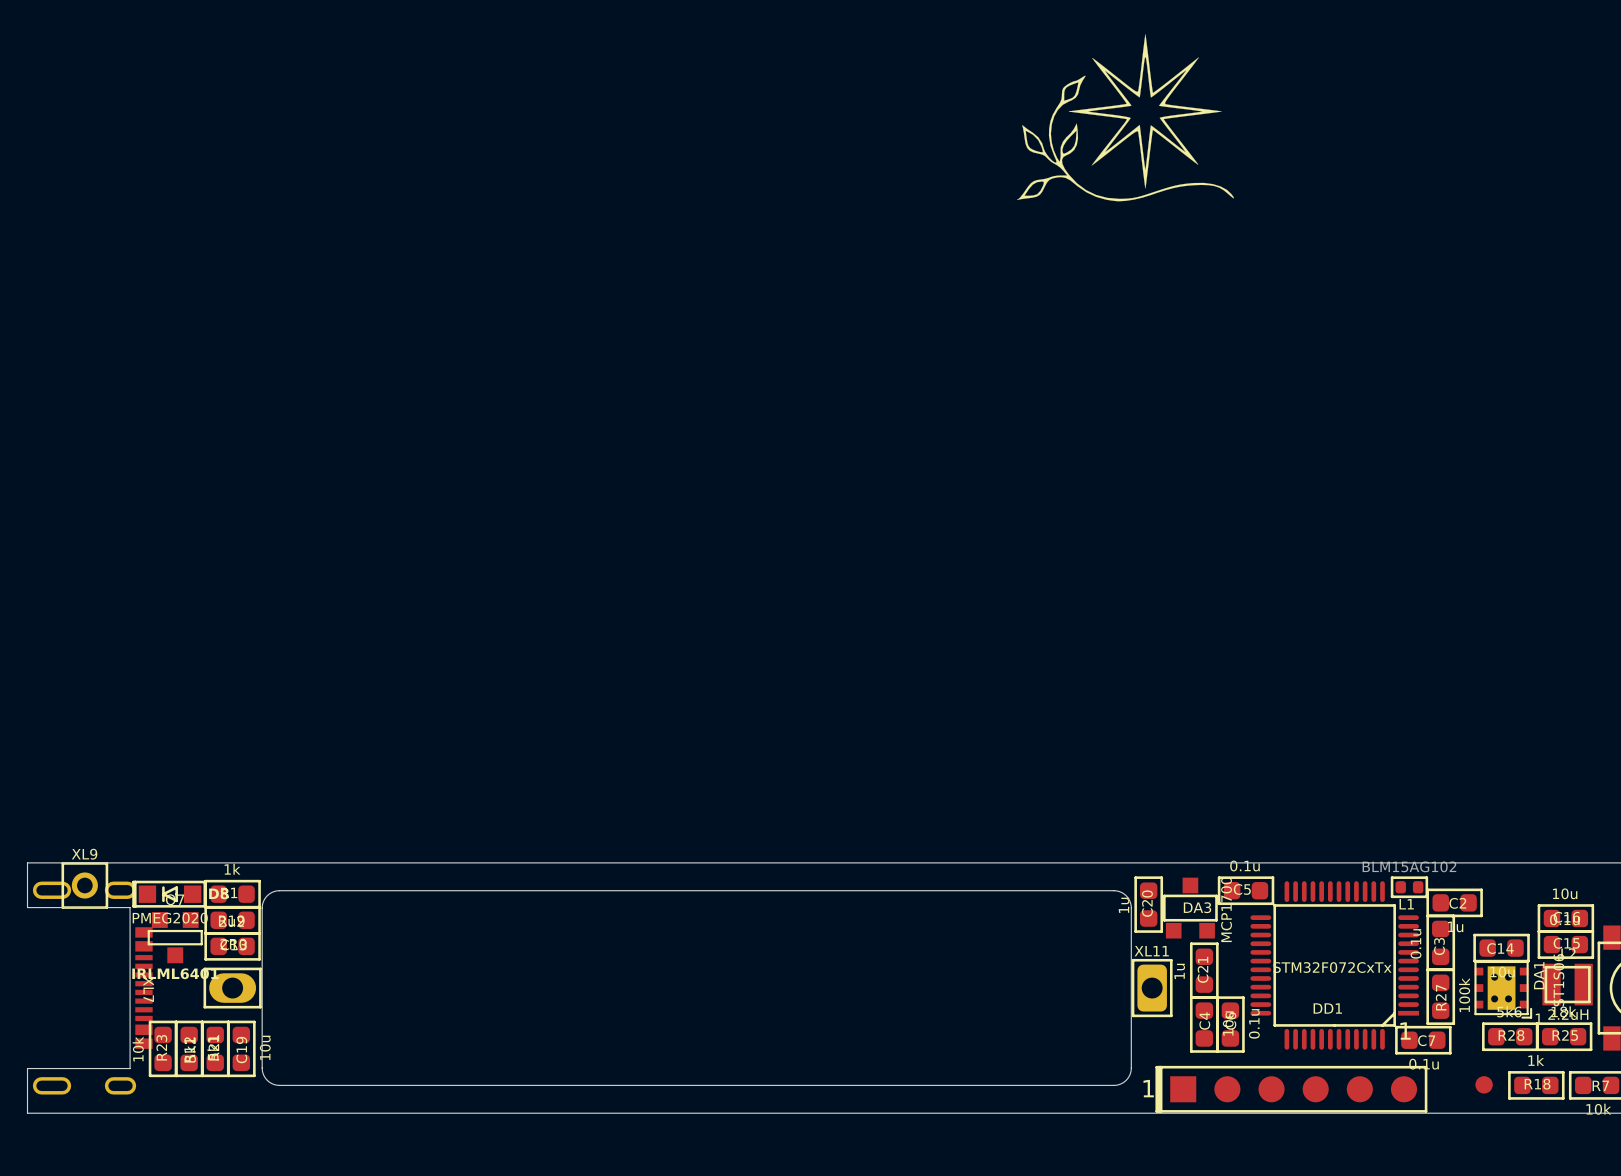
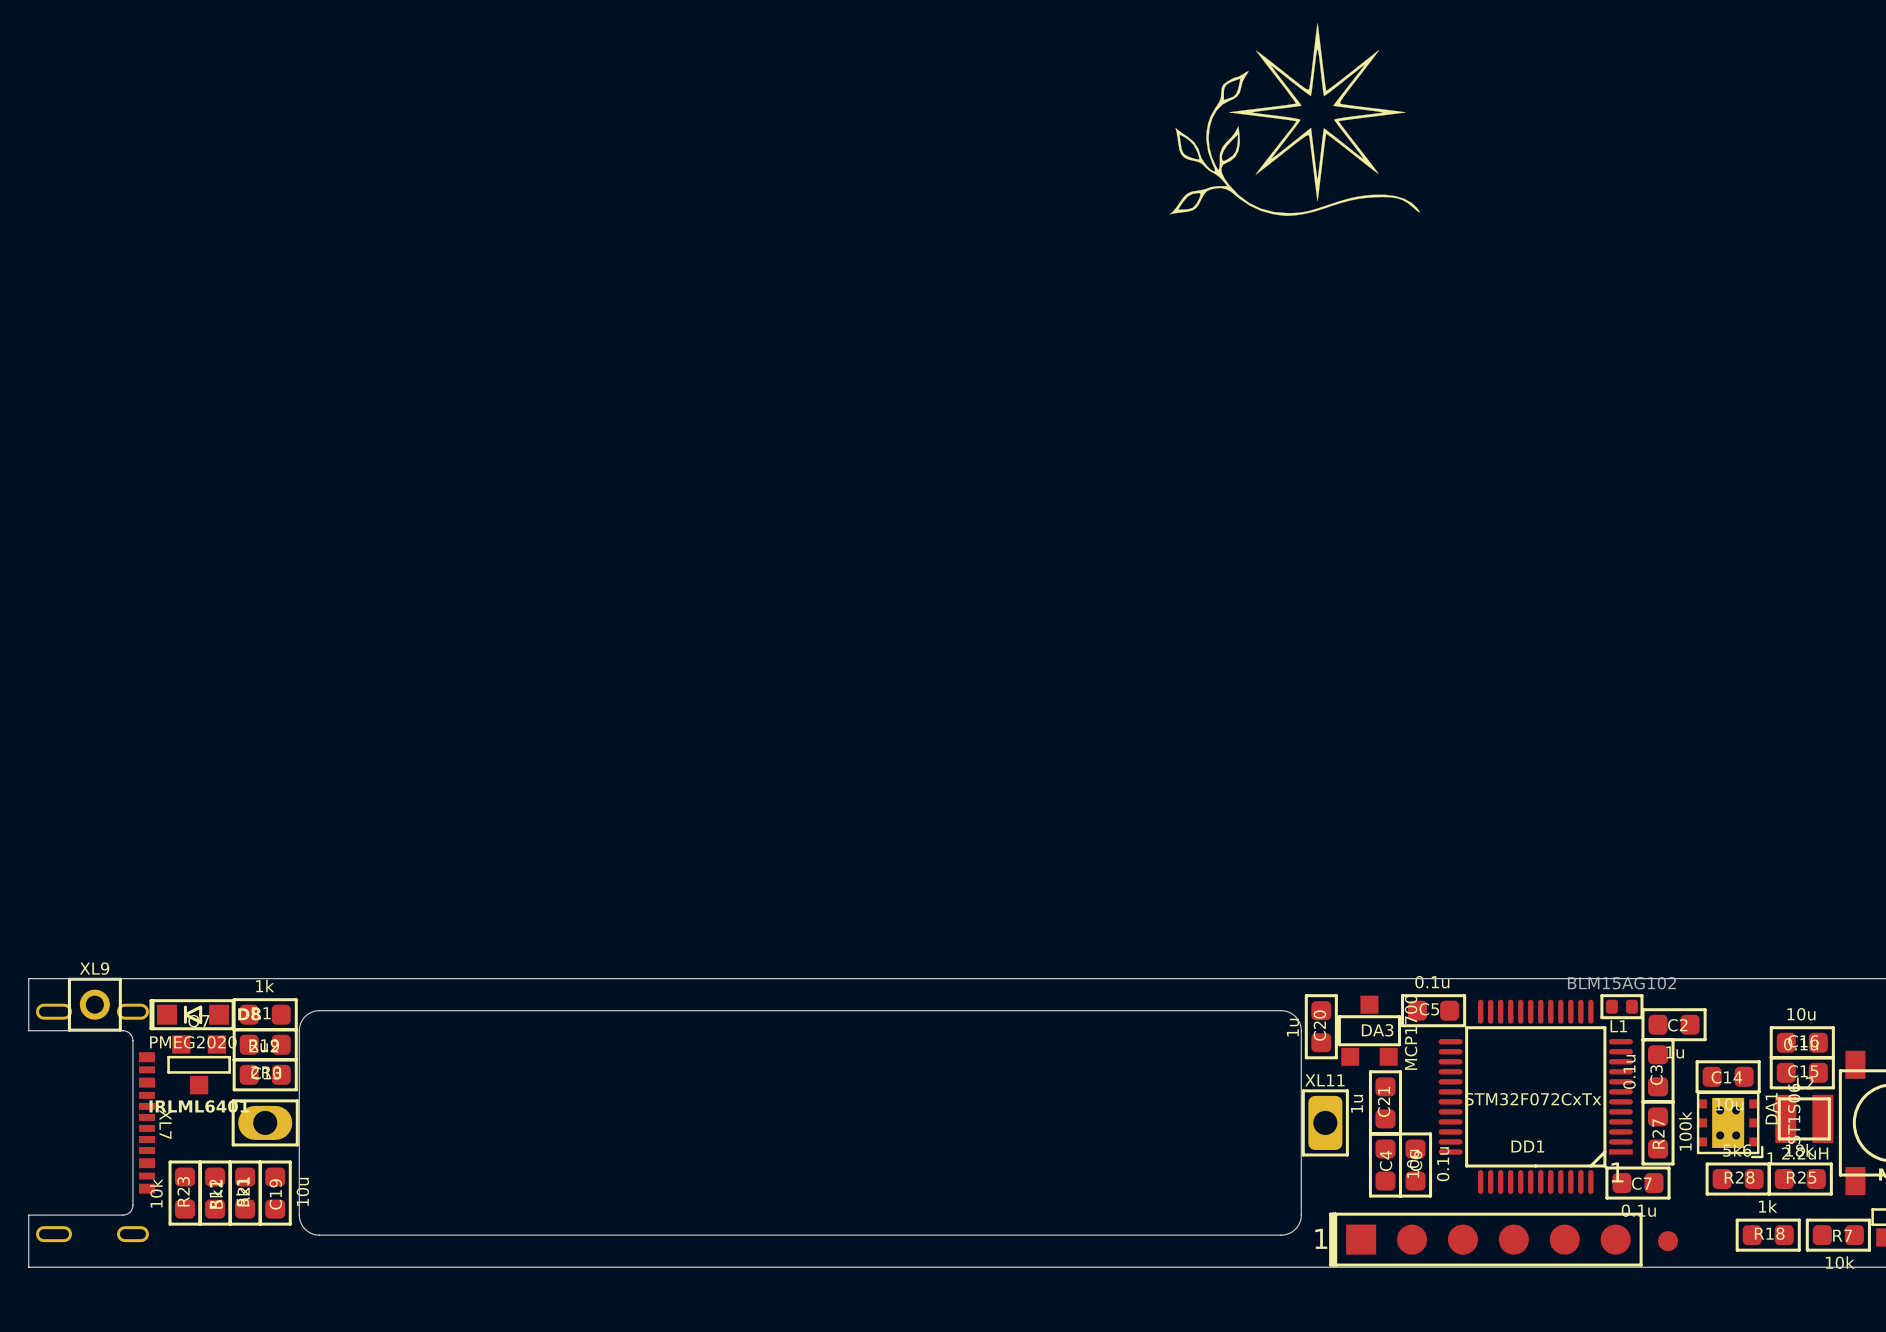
XL7 footprint: [27, 881, 153, 1095] -> [35, 1003, 156, 1243]
board edge: none -> (28, 1030) (124, 1030) (130, 1033) (132, 1040) (131, 1210) (122, 1215) (28, 1215)
part position: (1484, 1084) -> (1668, 1241)

